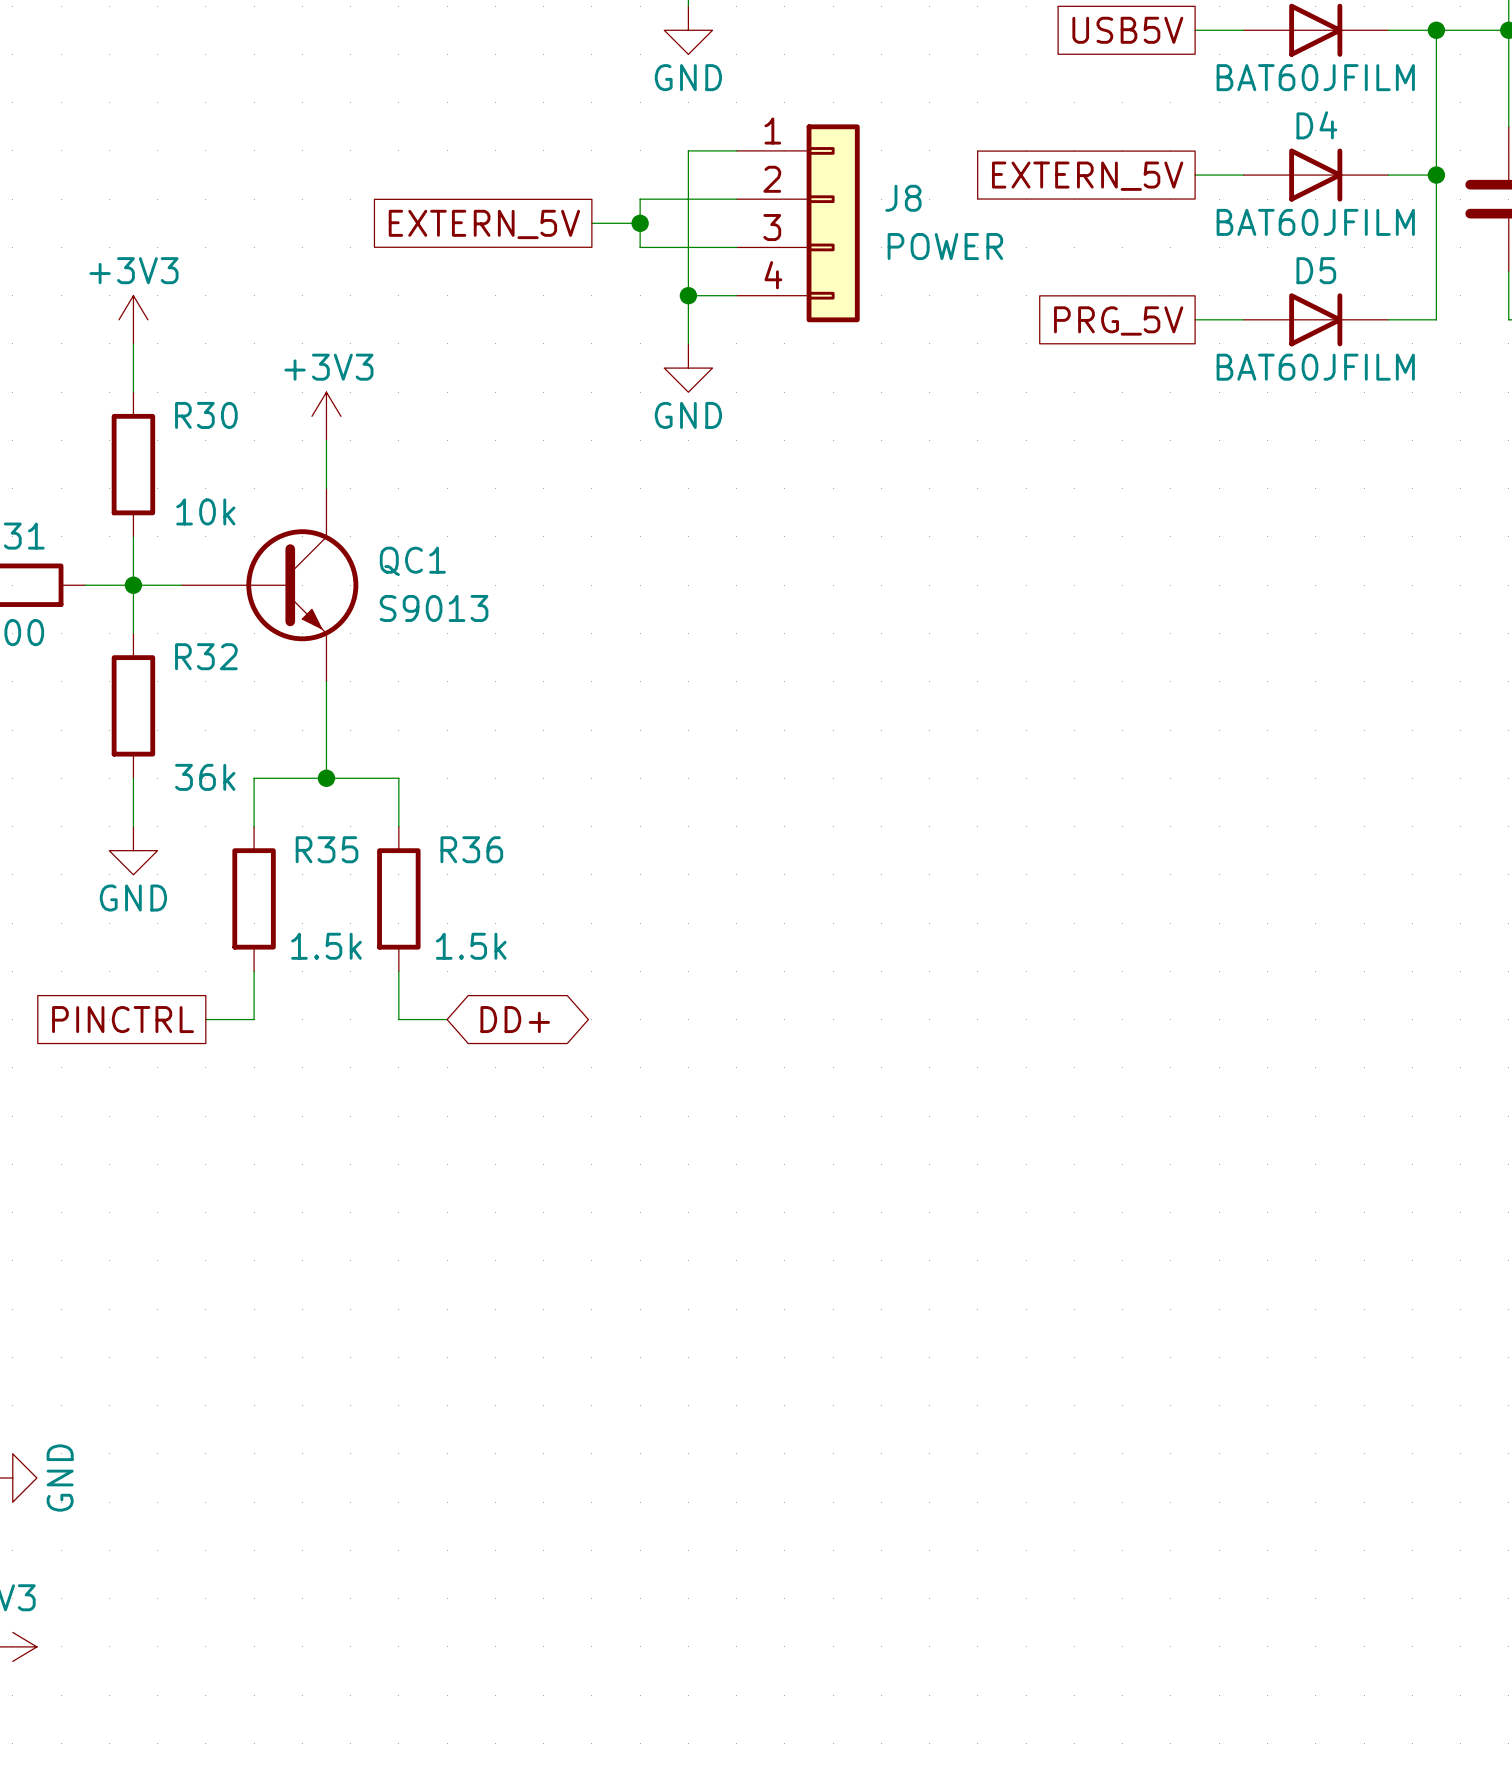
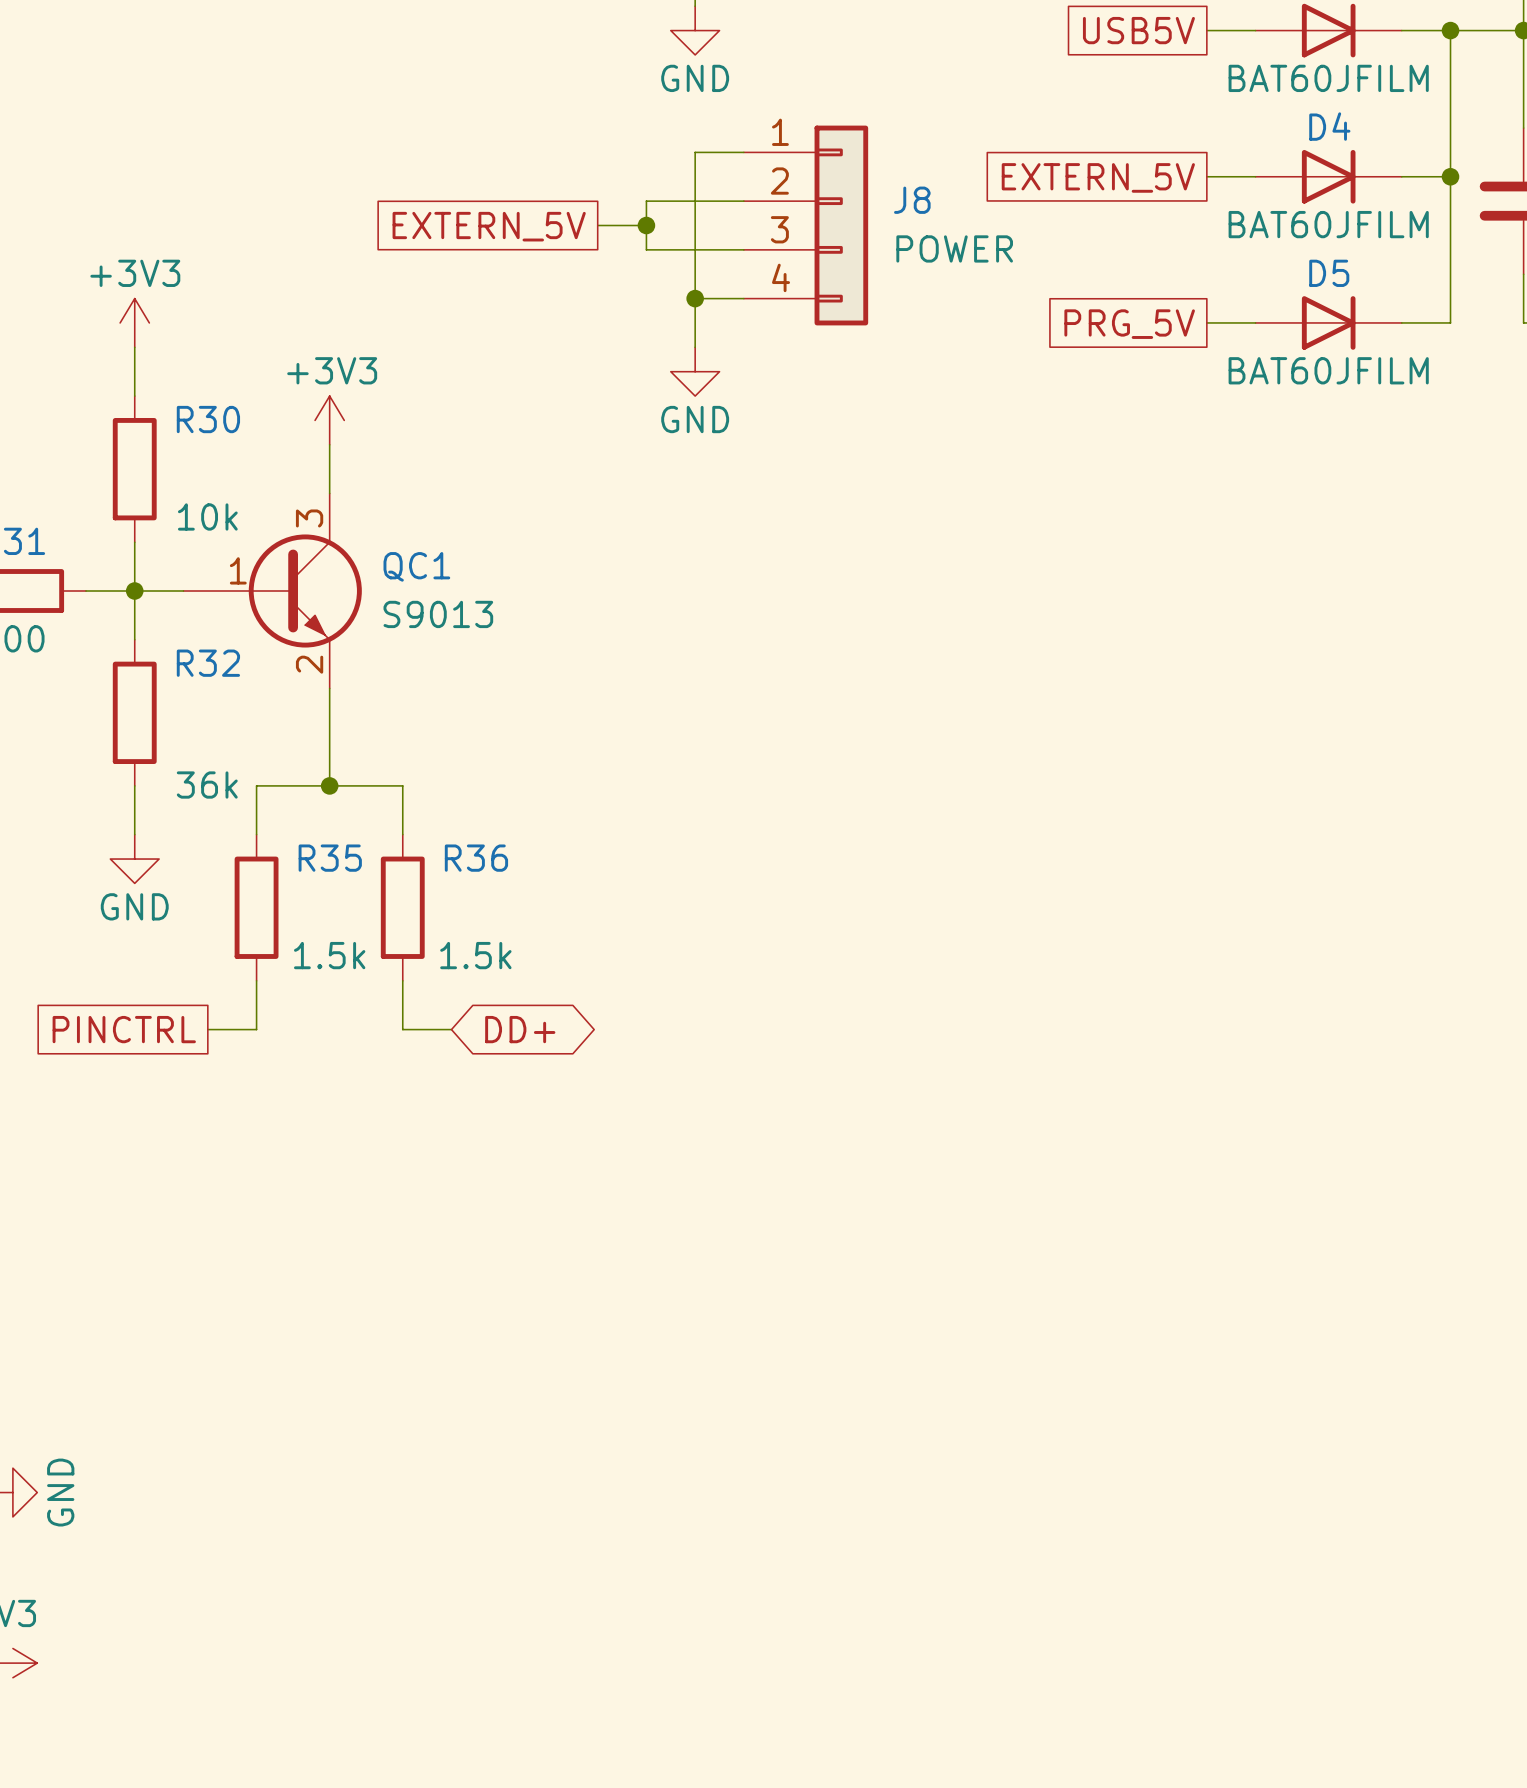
QC1 pin number: none -> 3 (309, 518)
QC1 pin number: none -> 1 (238, 570)
QC1 pin number: none -> 2 (309, 664)

